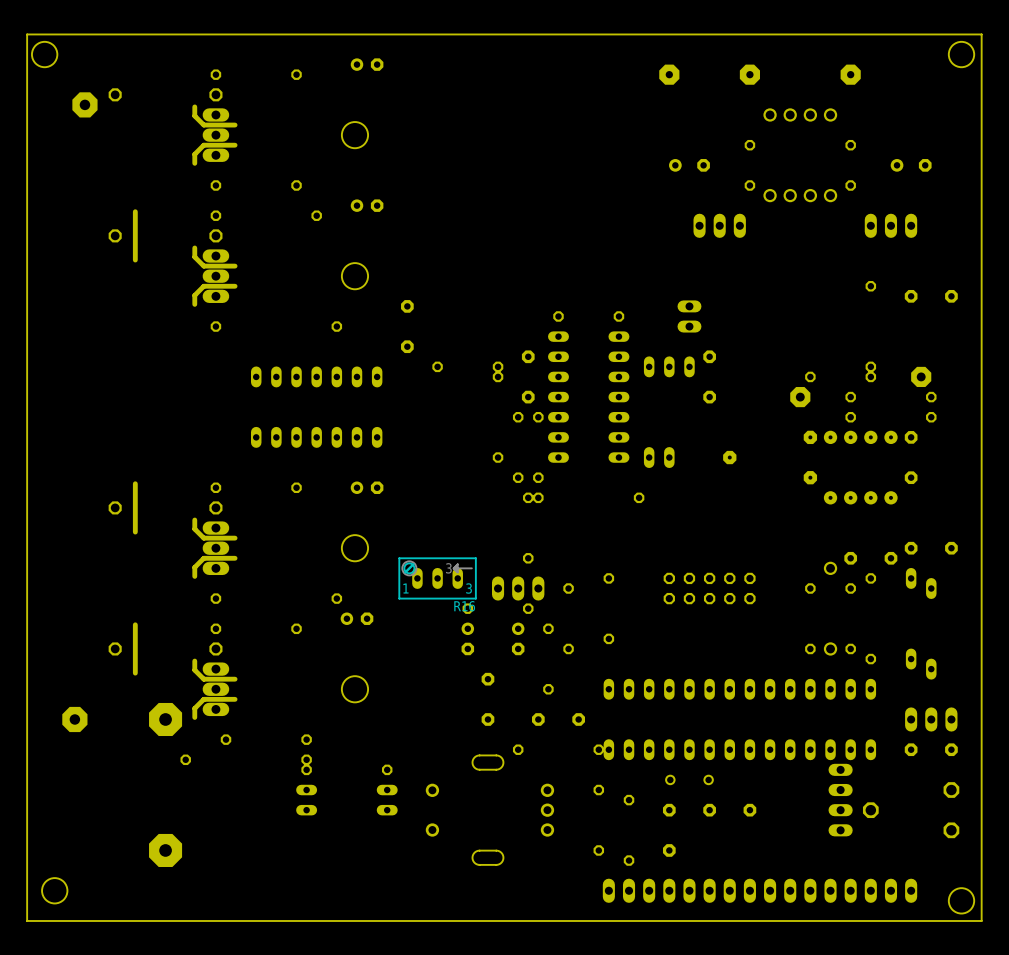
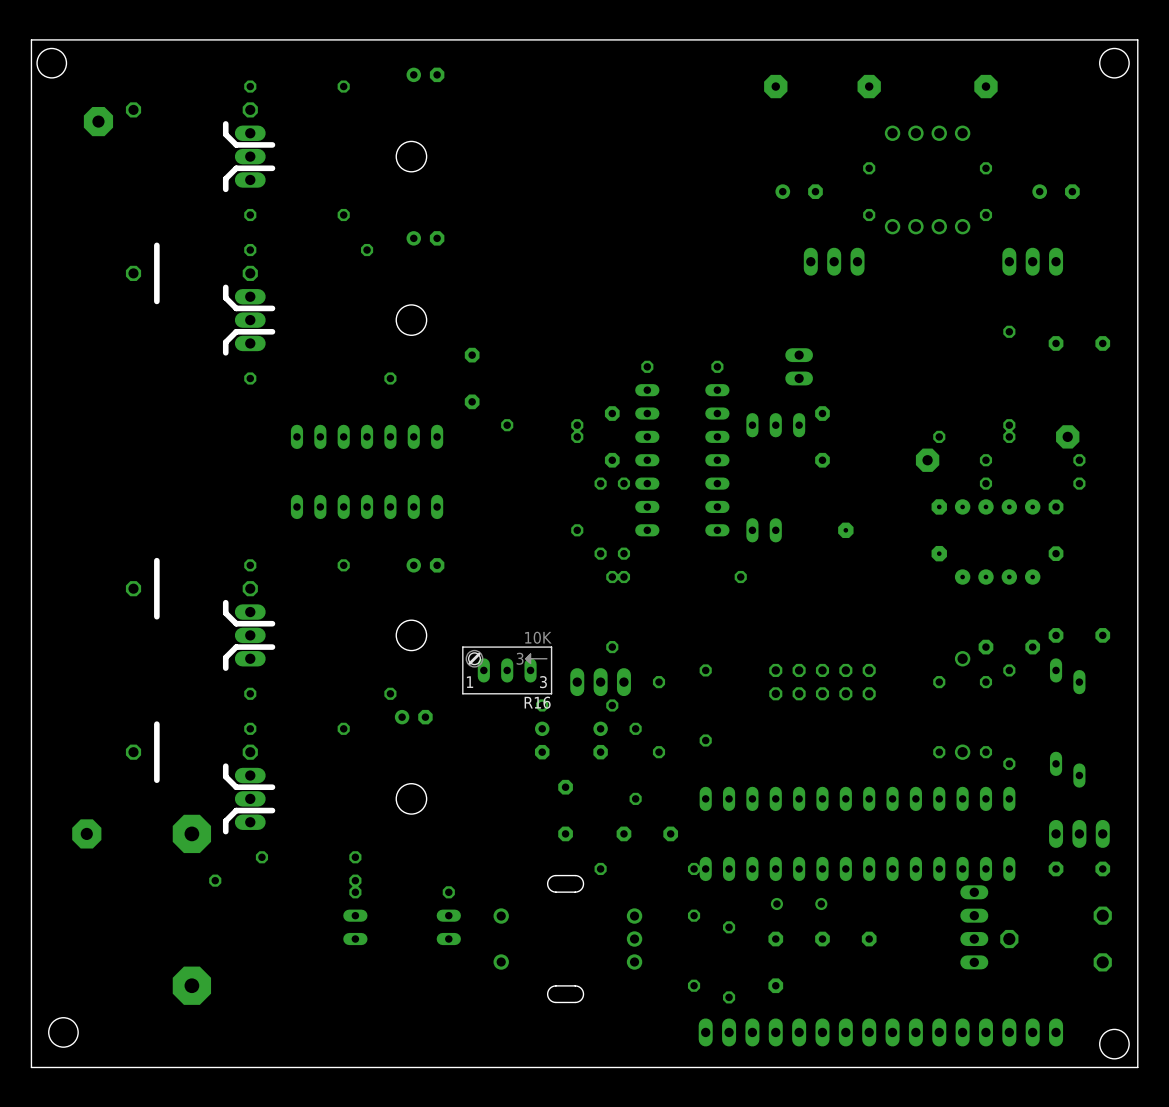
R16 value: none -> 10K (538, 637)

